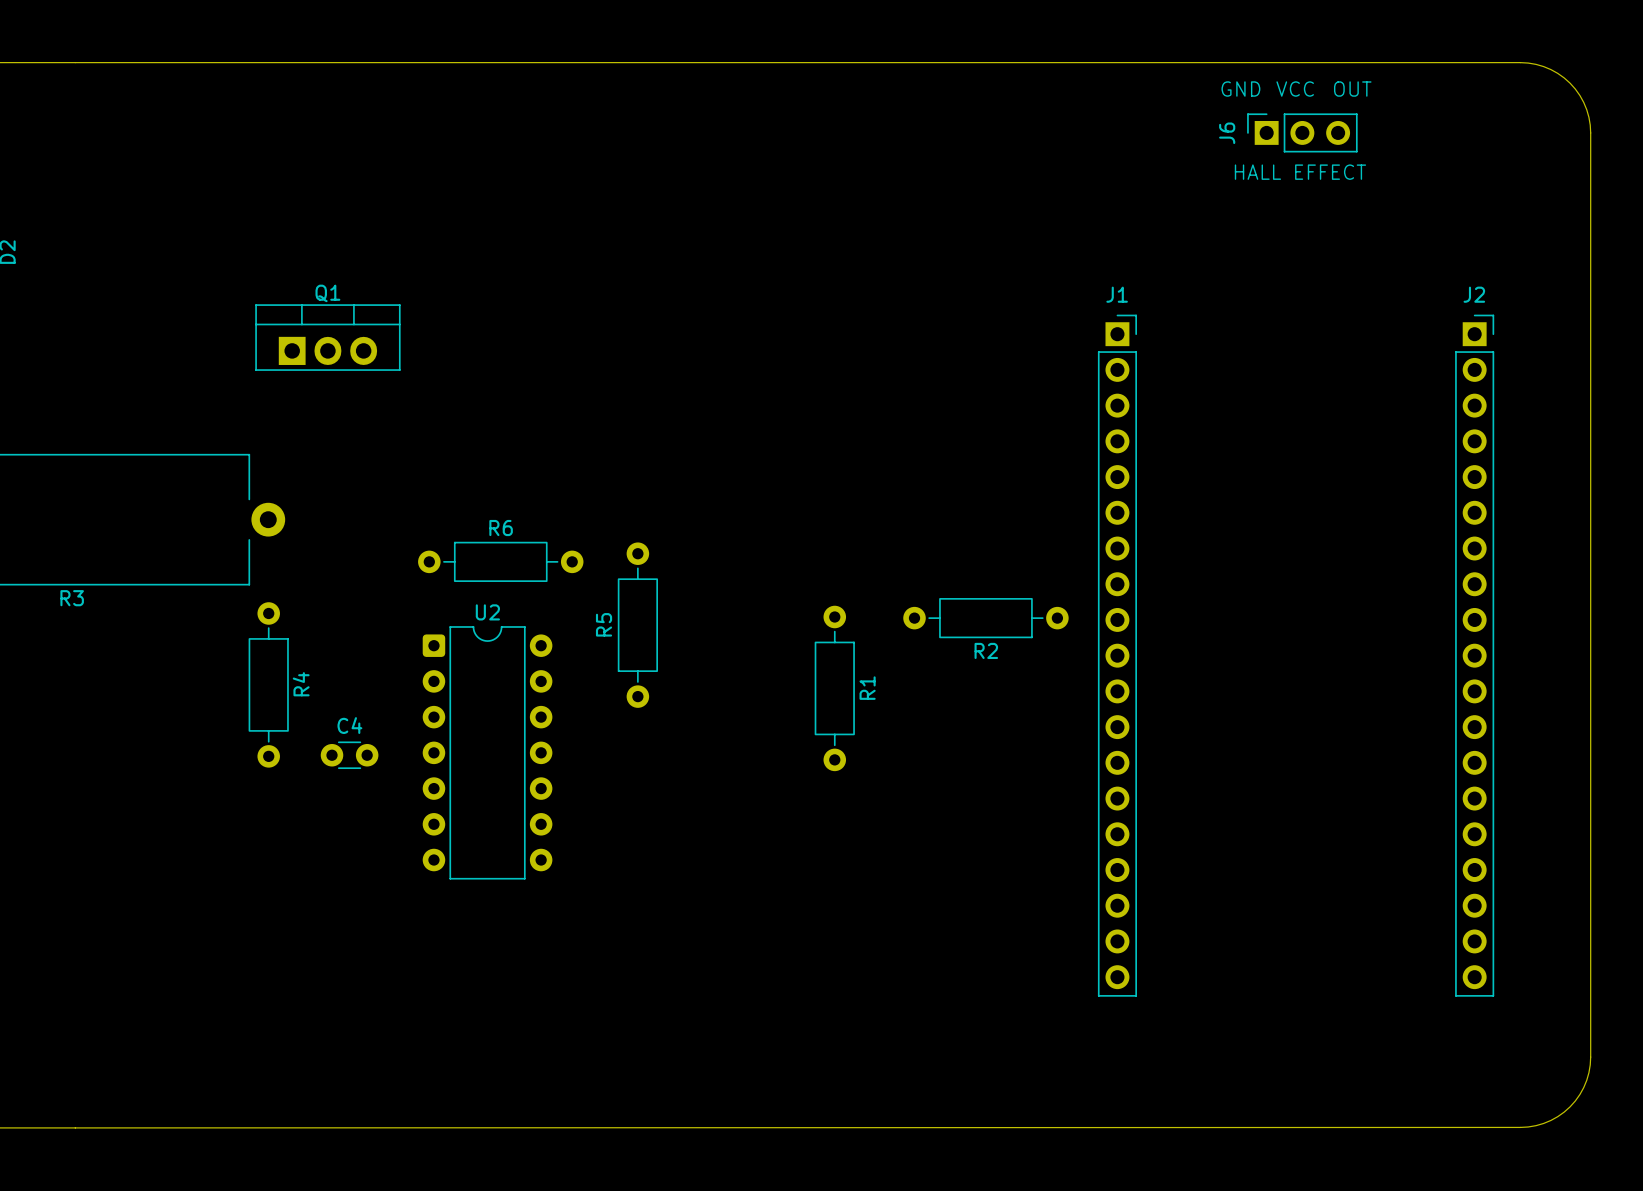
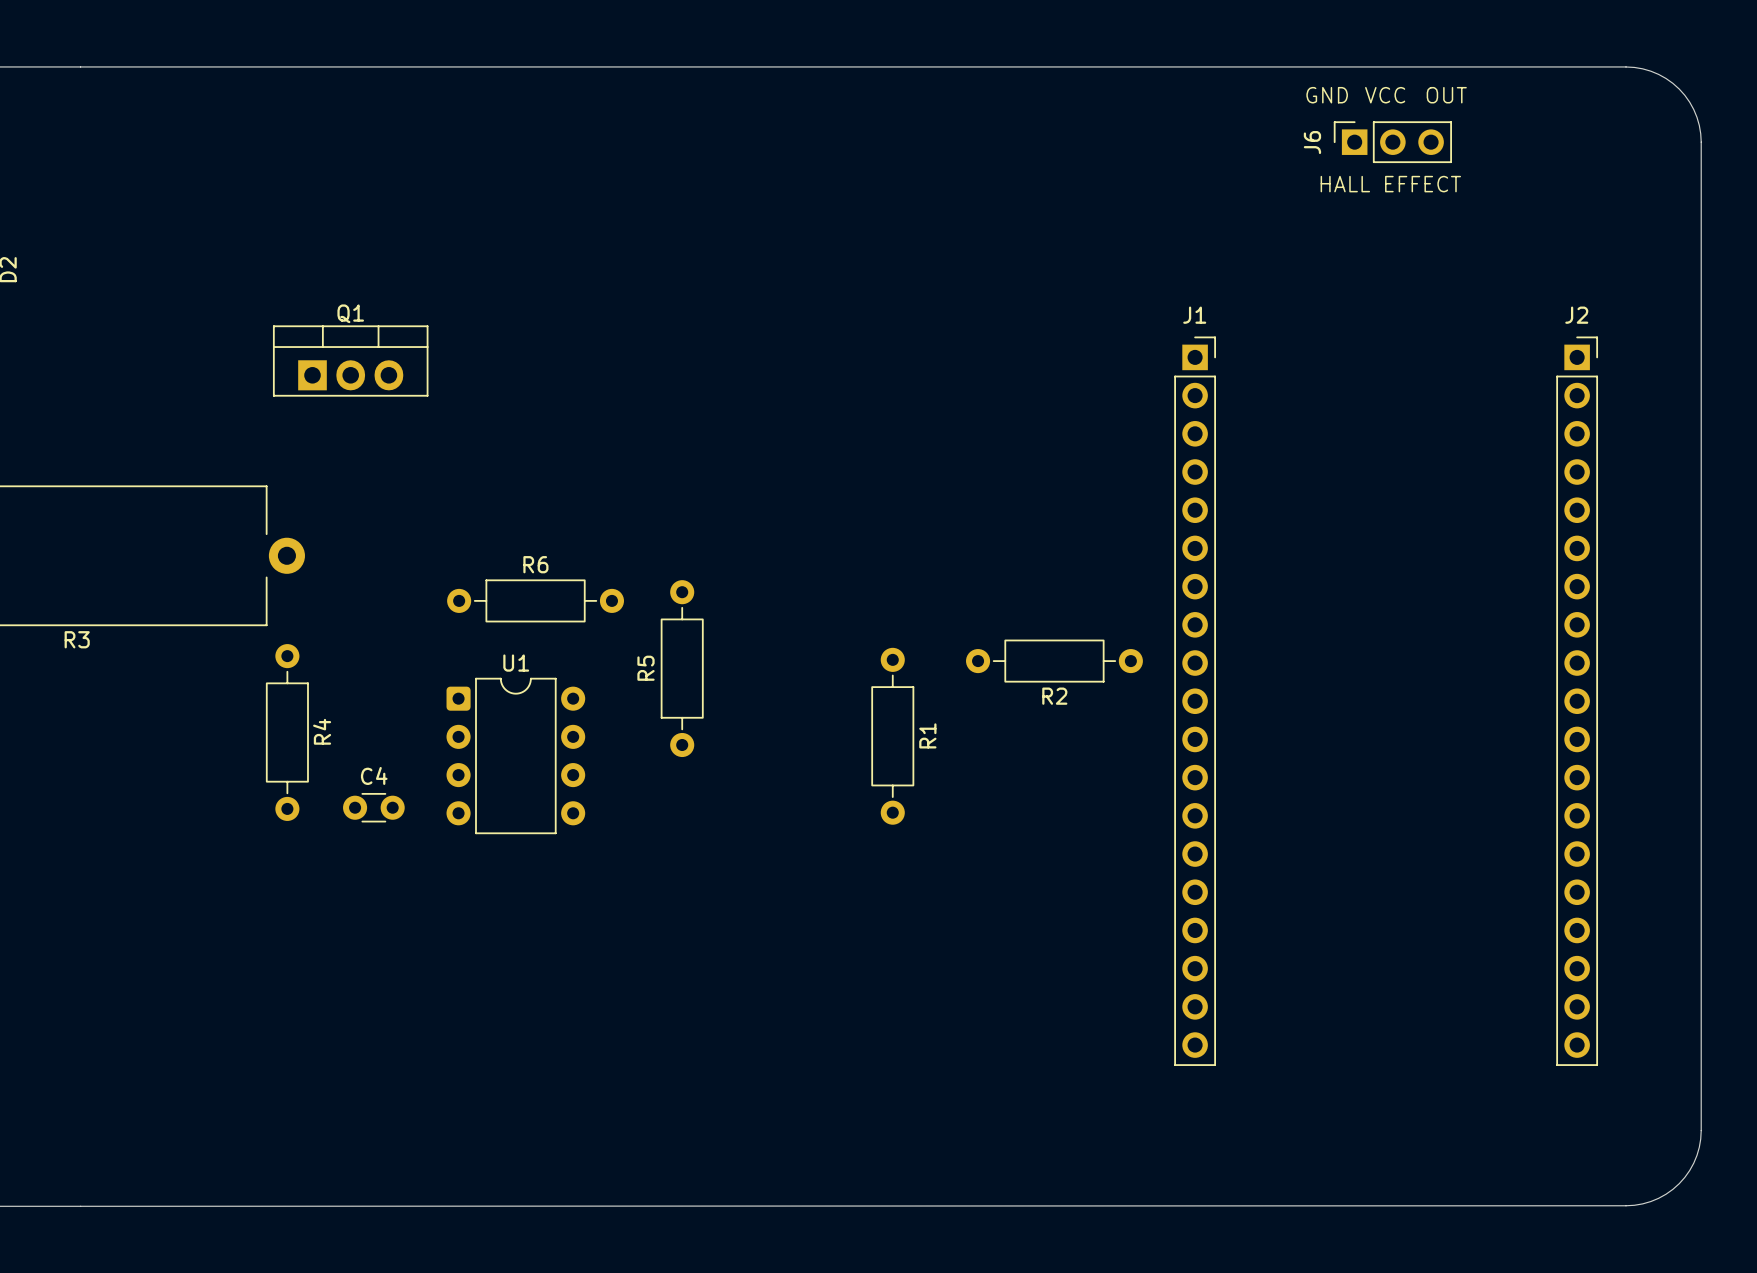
U1: none -> (515, 755)
U2: (487, 752) -> none

